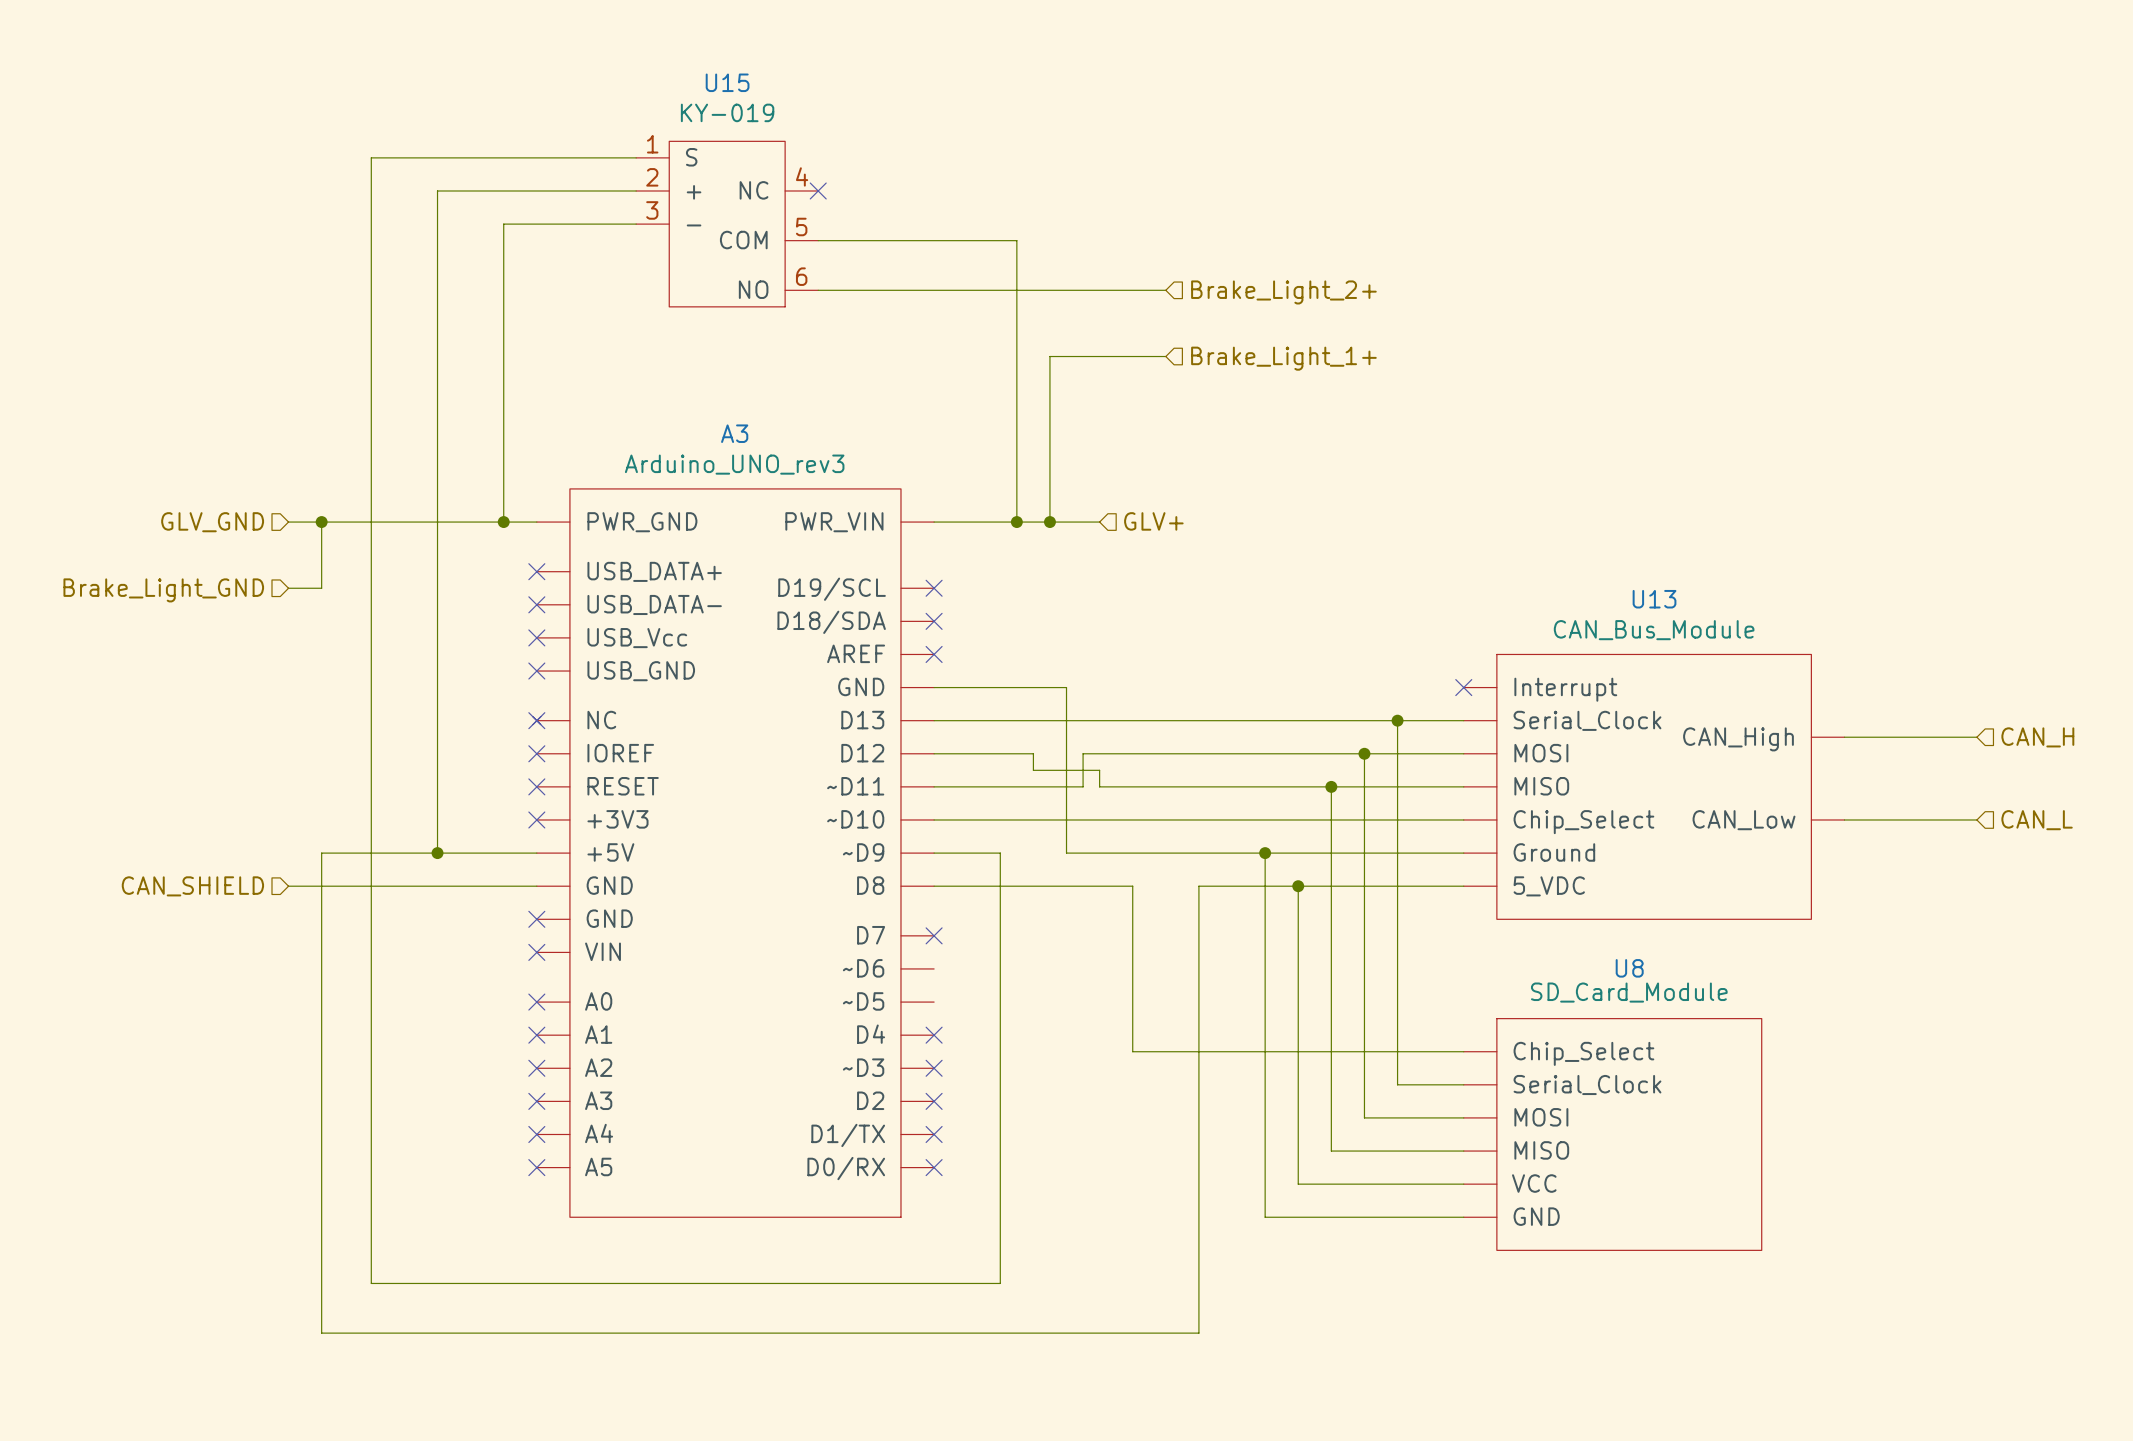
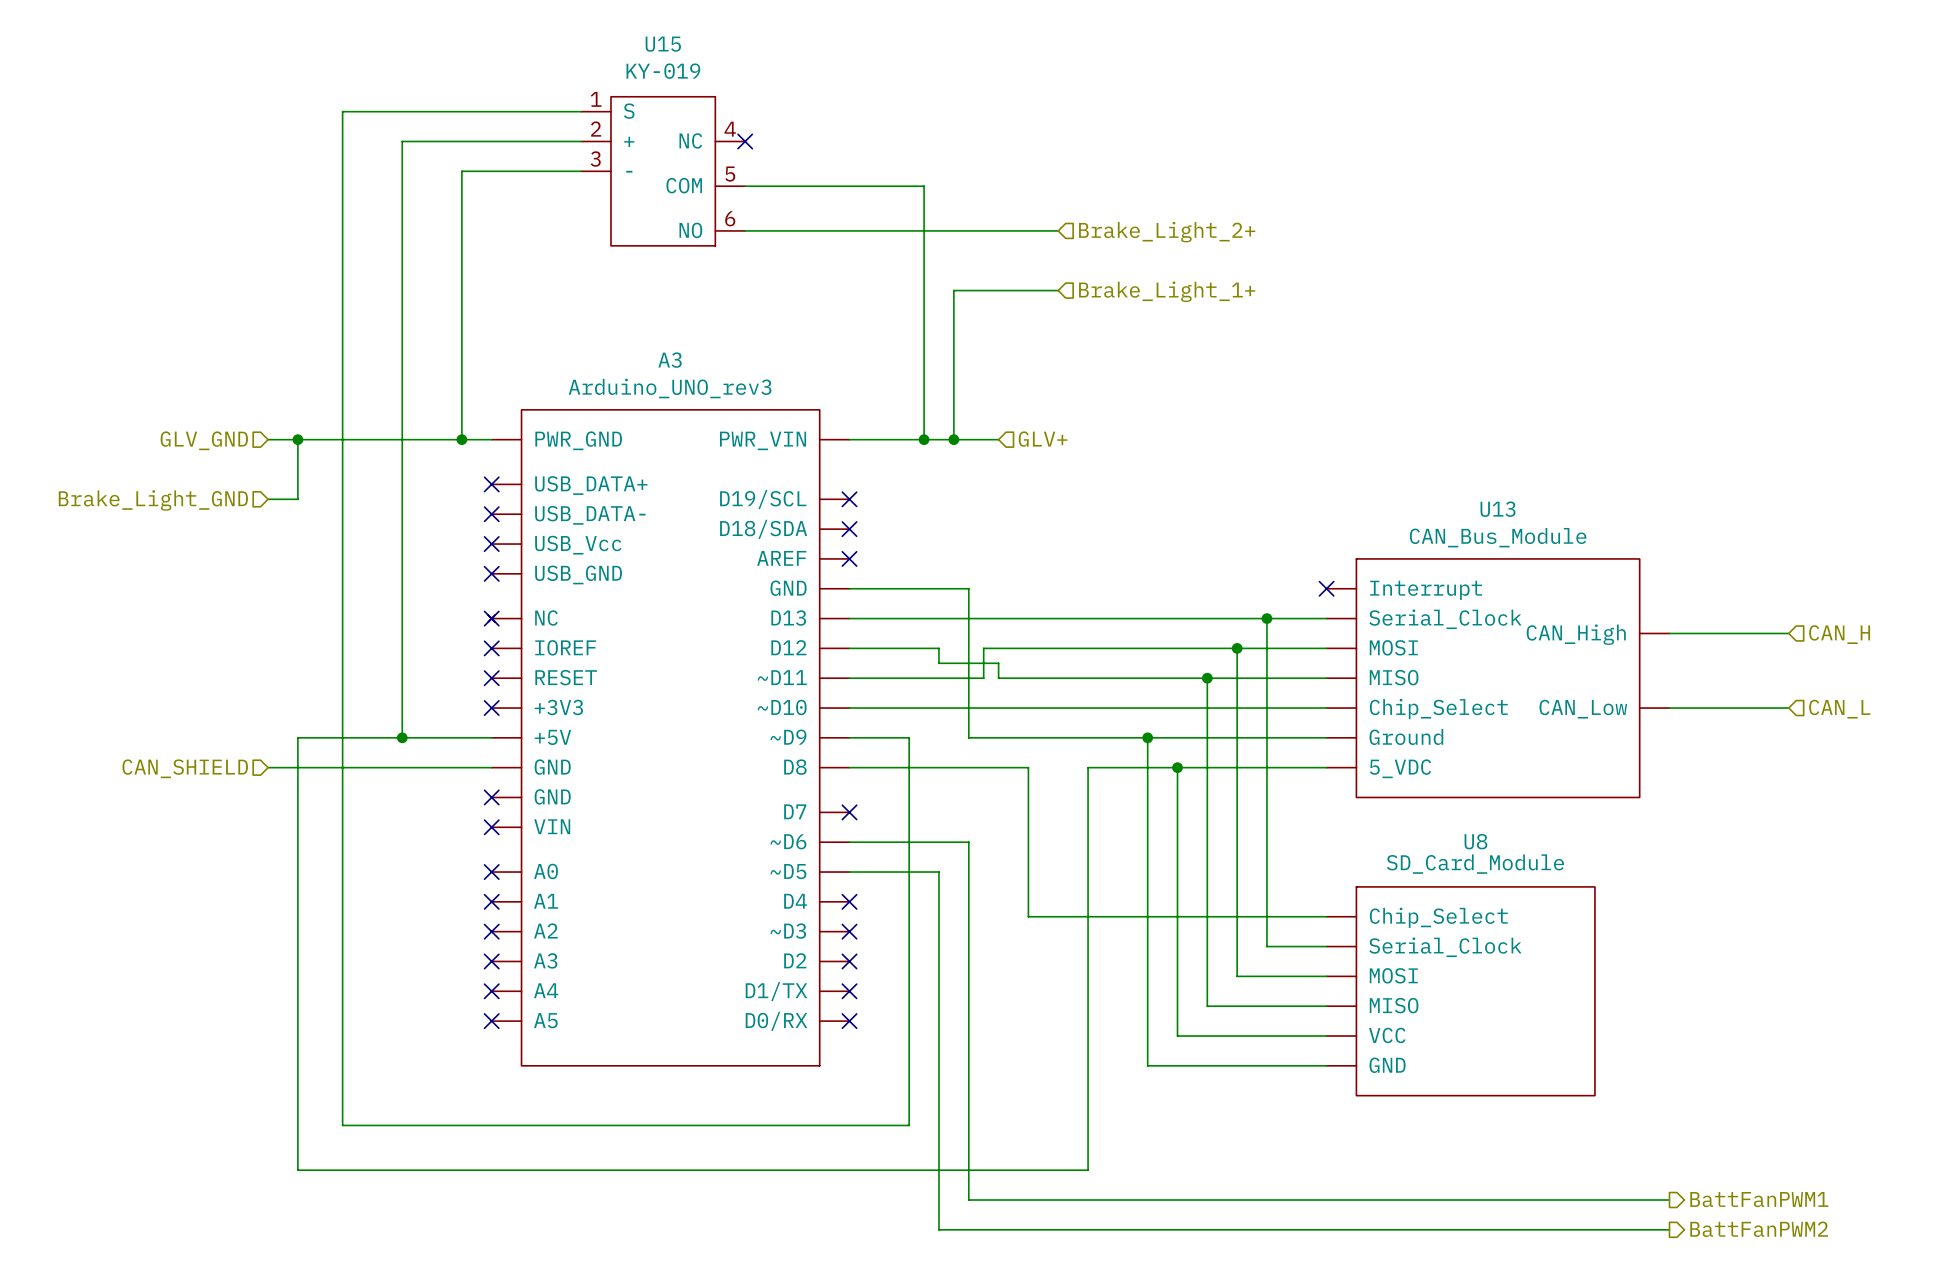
wire: none -> (849, 842) (968, 842) (968, 1200) (1669, 1200)
wire: none -> (849, 872) (938, 872) (938, 1229) (1669, 1229)
hierarchical label: none -> BattFanPWM1 (1759, 1199)
hierarchical label: none -> BattFanPWM2 (1759, 1229)

